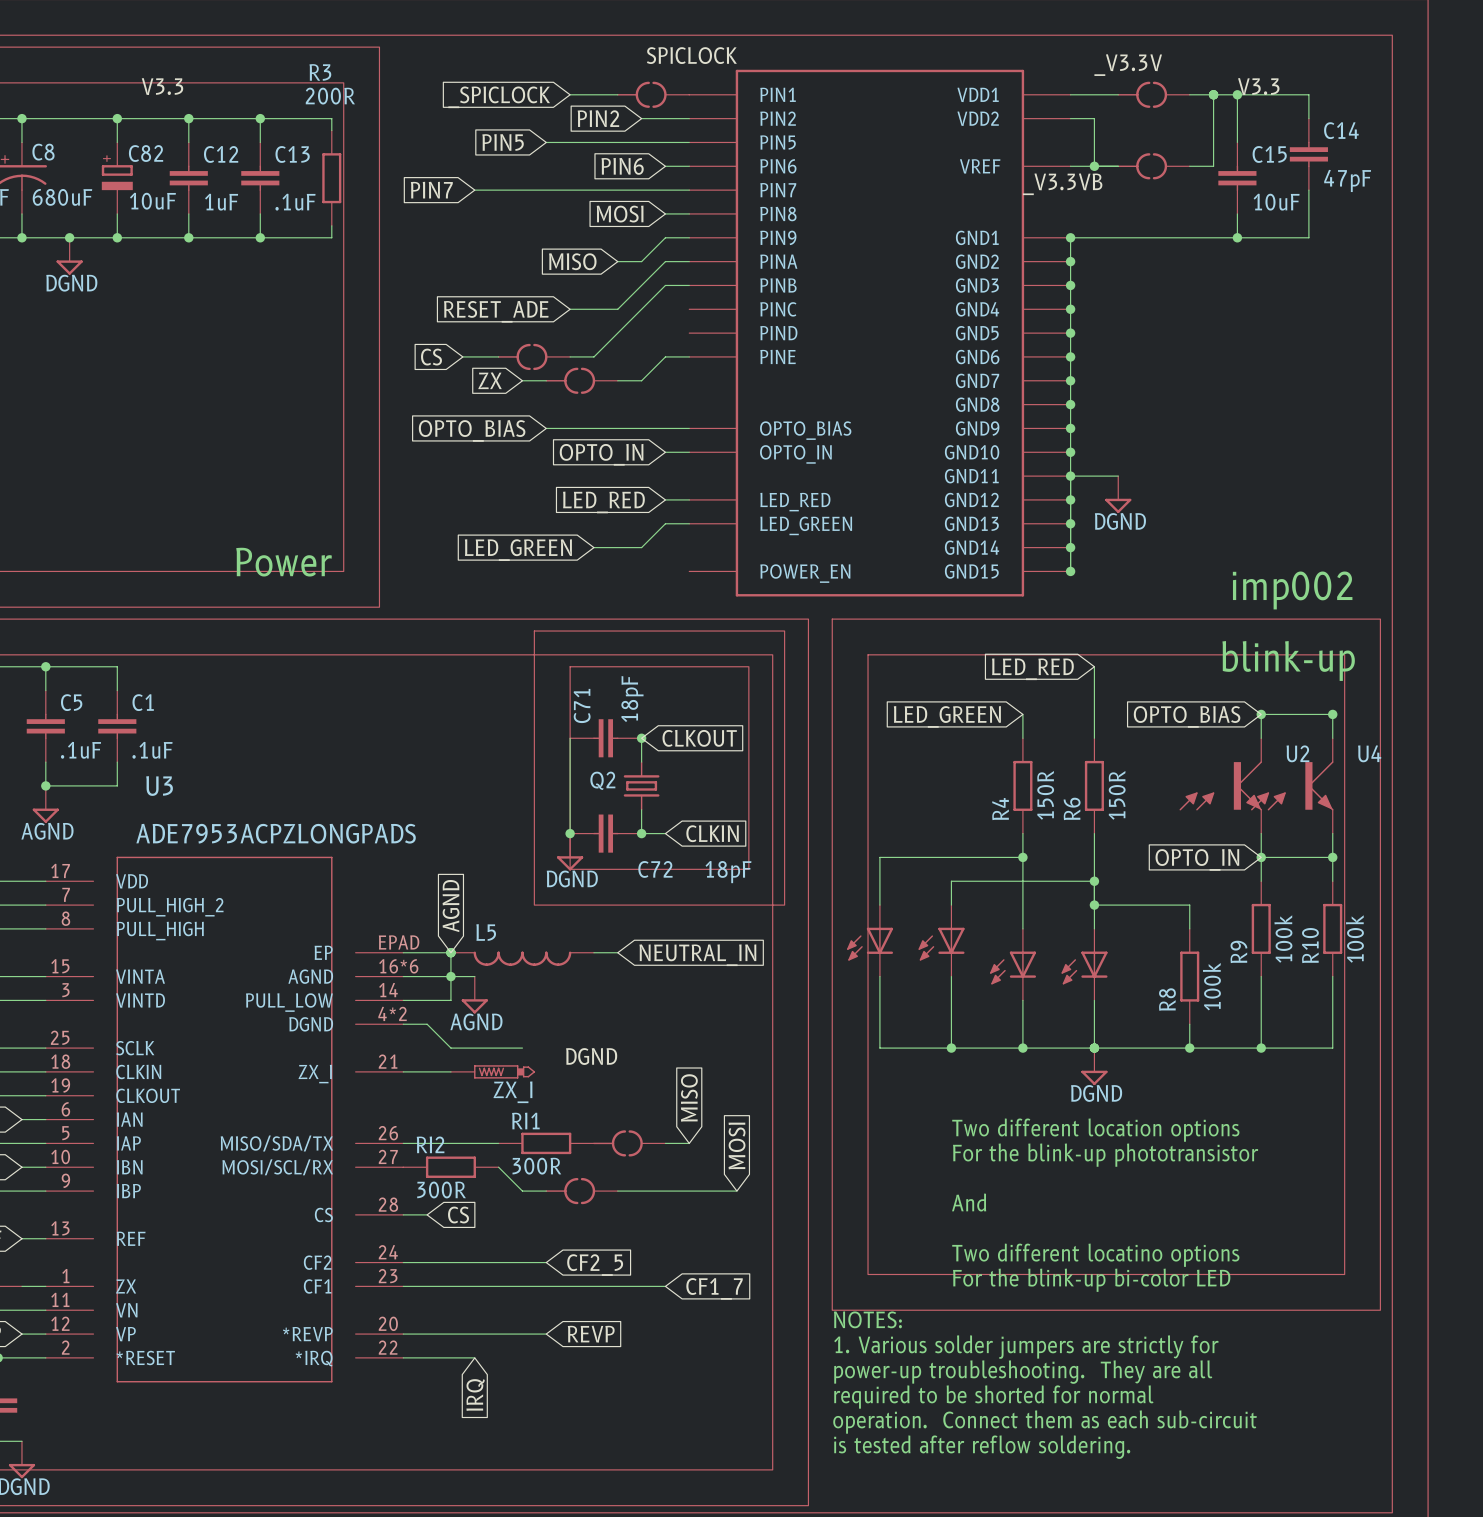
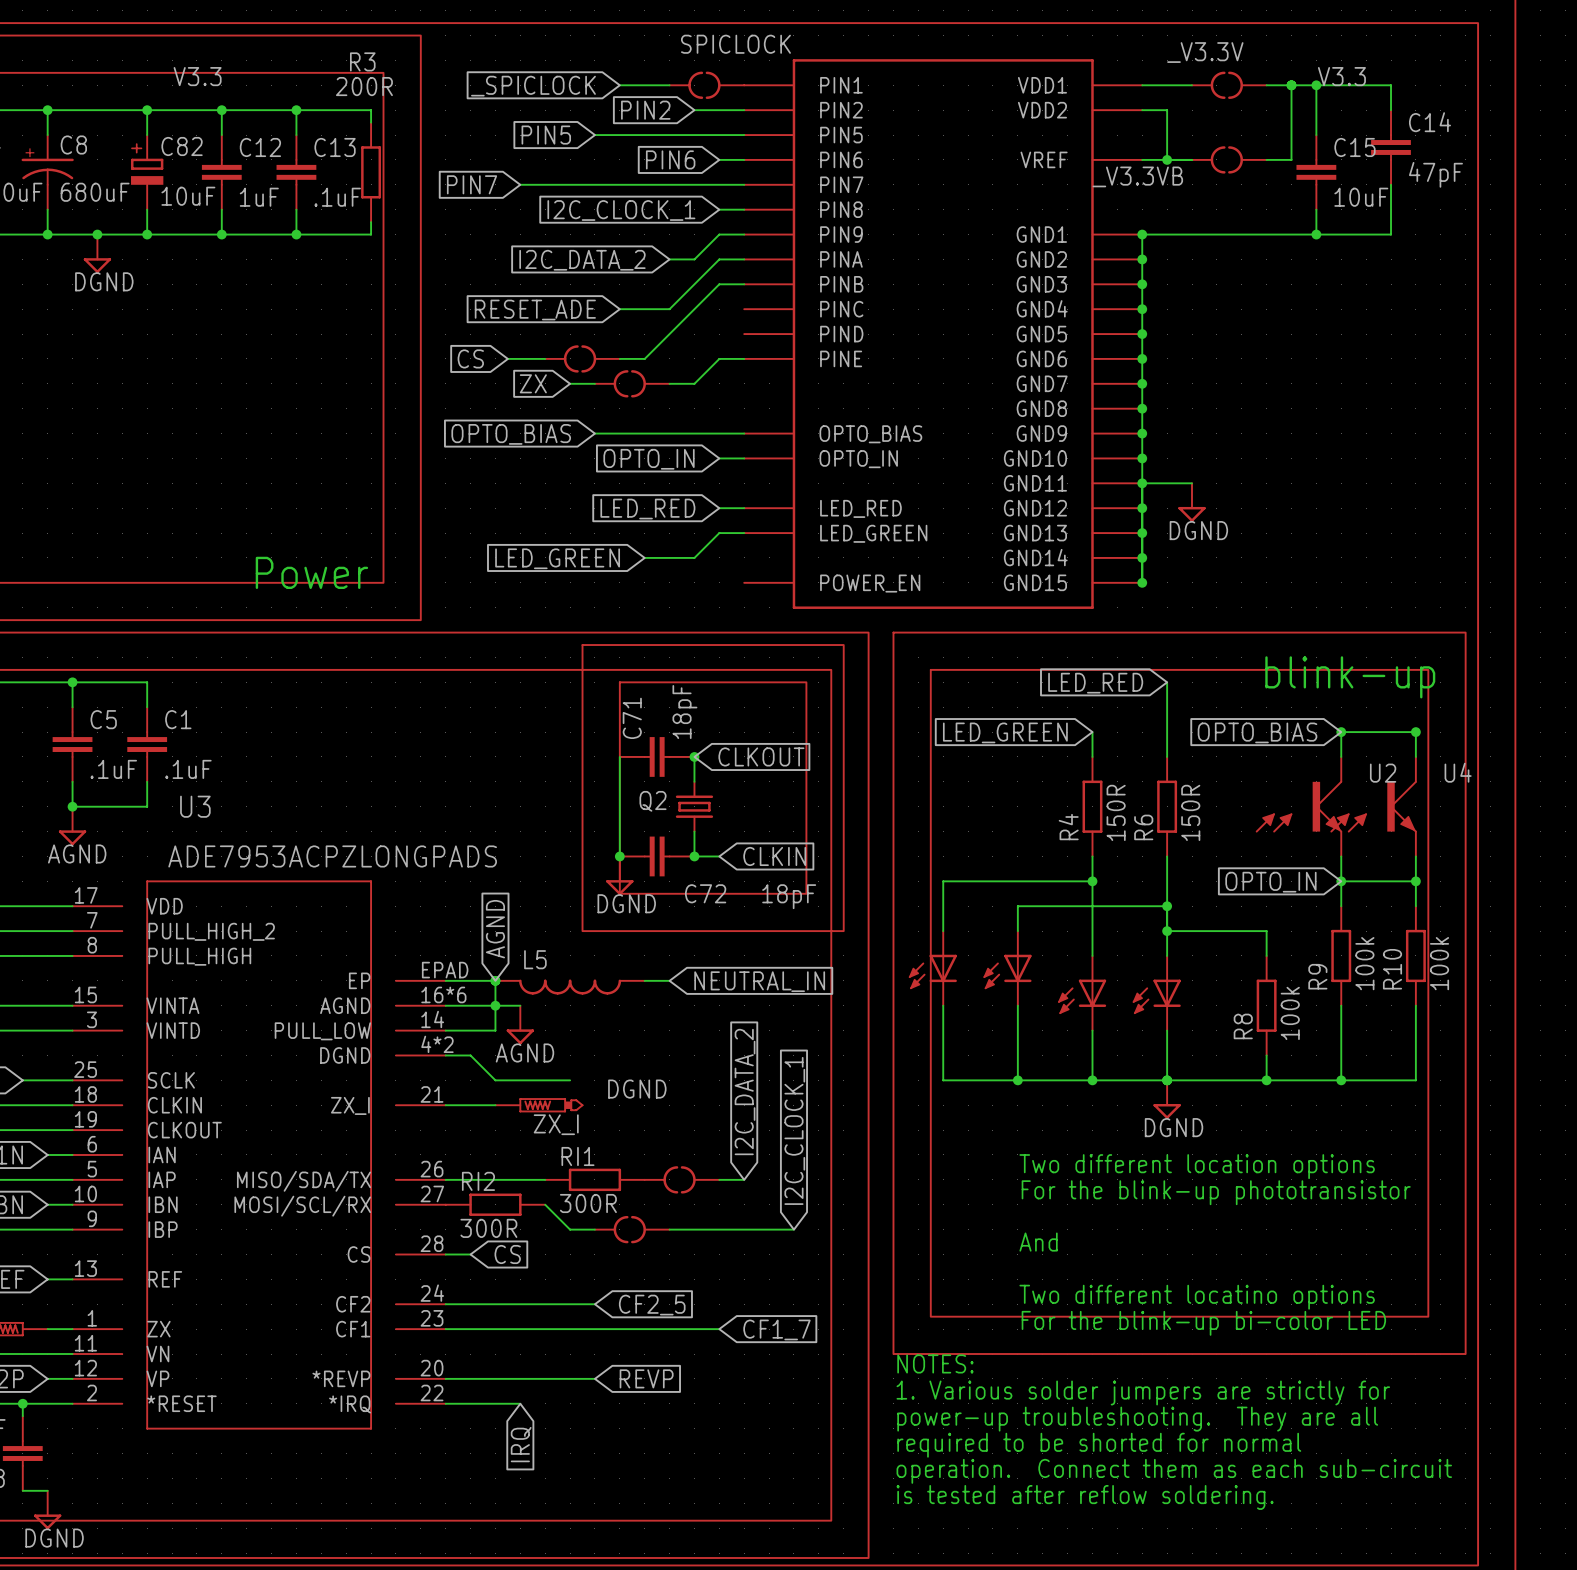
global label: MOSI (620, 214) -> I2C_CLOCK_1 (621, 210)
global label: MISO (572, 261) -> I2C_DATA_2 (582, 260)
text: imp002 (1292, 590) -> none
global label: MISO (689, 1097) -> I2C_DATA_2 (745, 1092)
global label: MOSI (737, 1146) -> I2C_CLOCK_1 (794, 1130)

